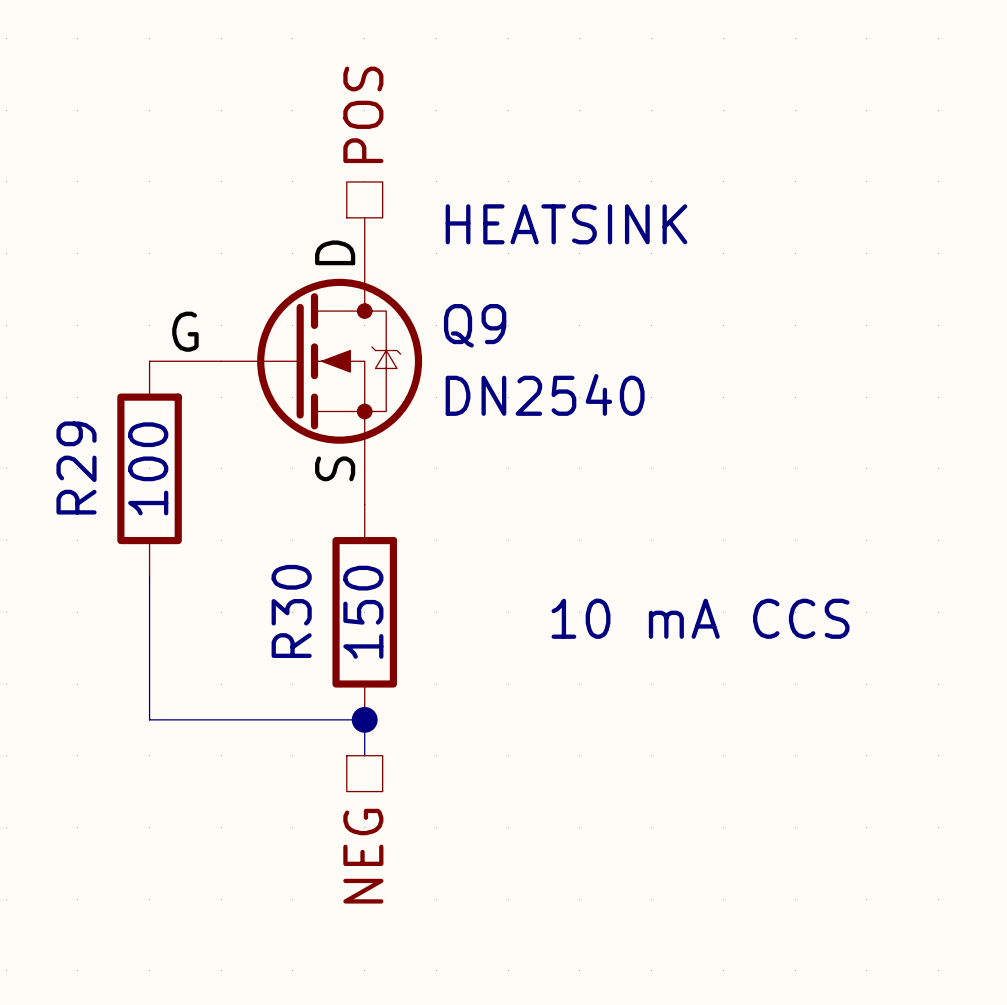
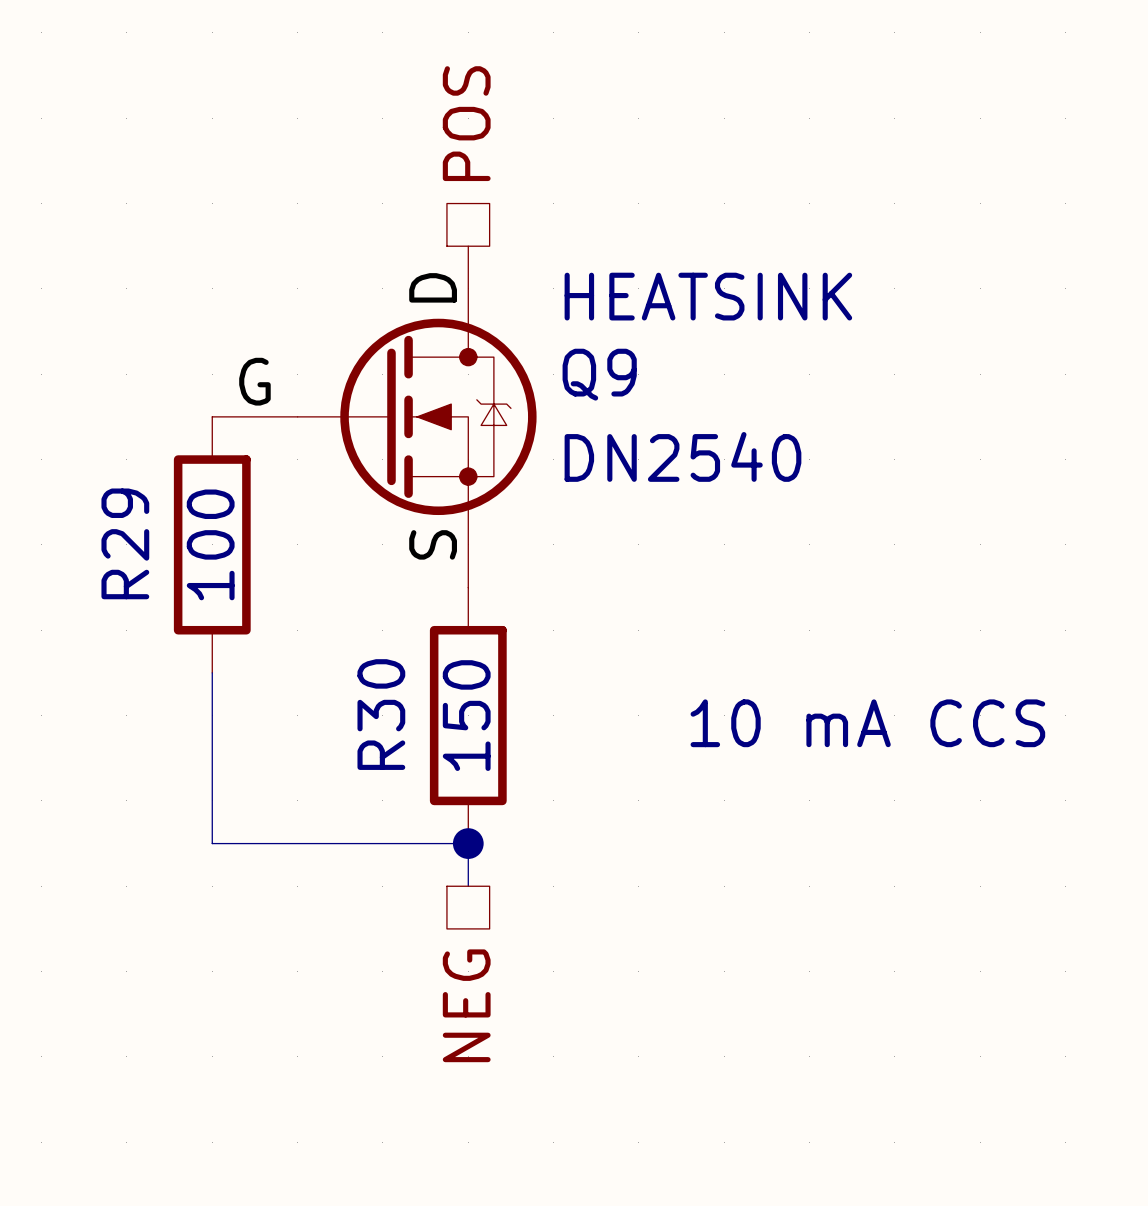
text position: HEATSINK (566, 224) -> HEATSINK (708, 296)

